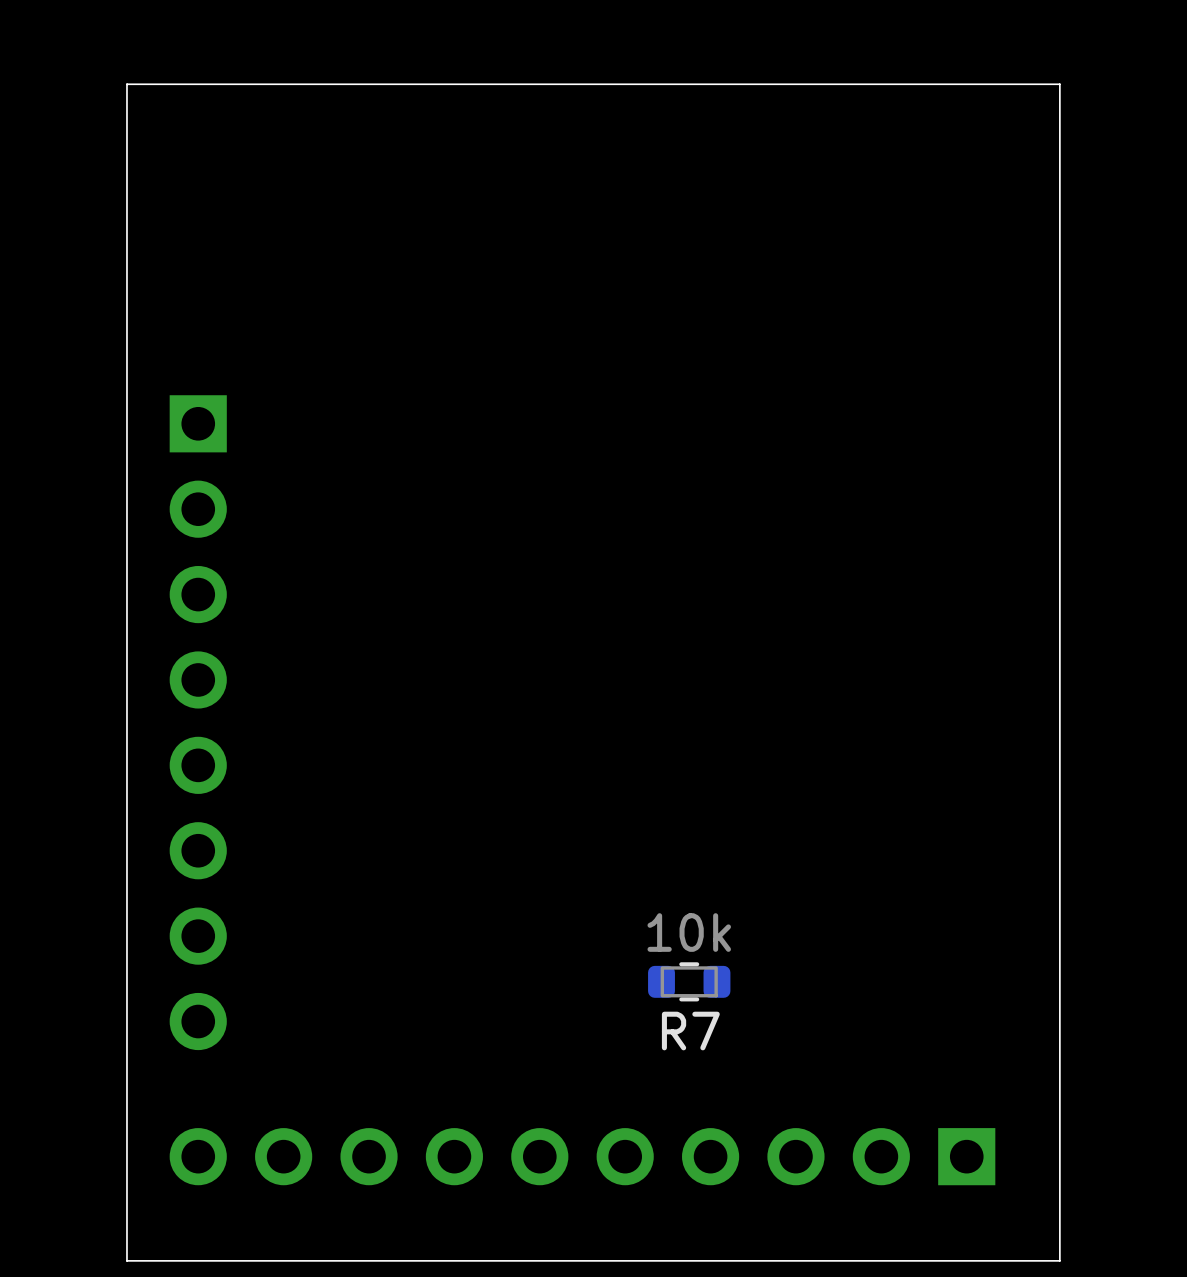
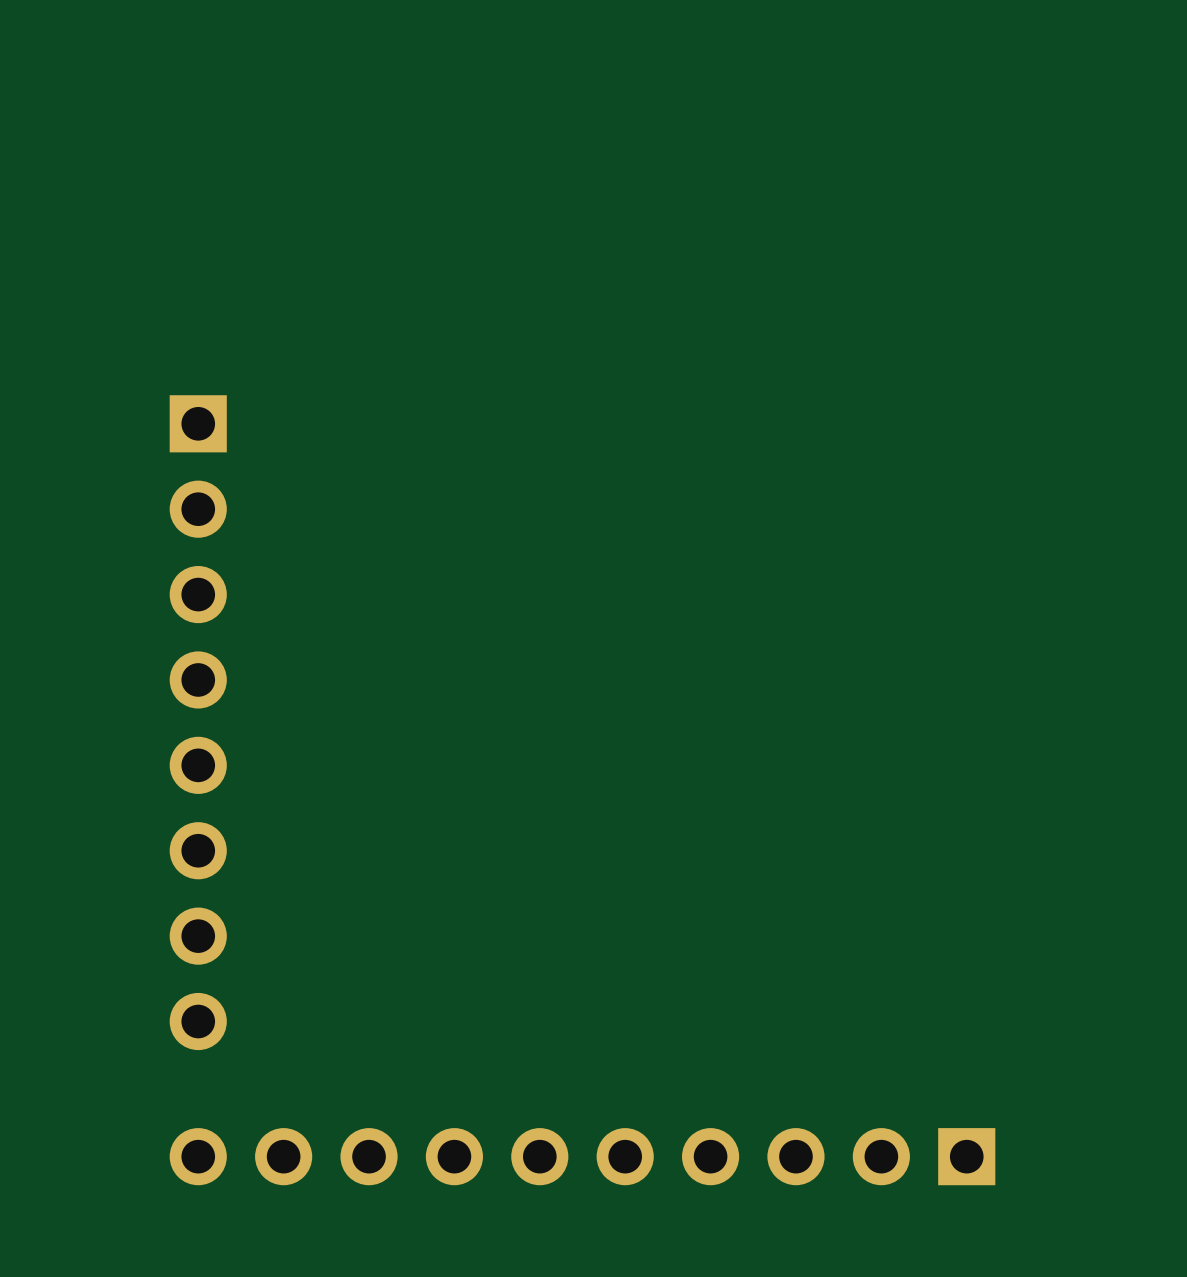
board edge: (1059, 84) (126, 84) (126, 1260) (1059, 1260) (1059, 84) -> none
R7: 10k (689, 981) -> none

